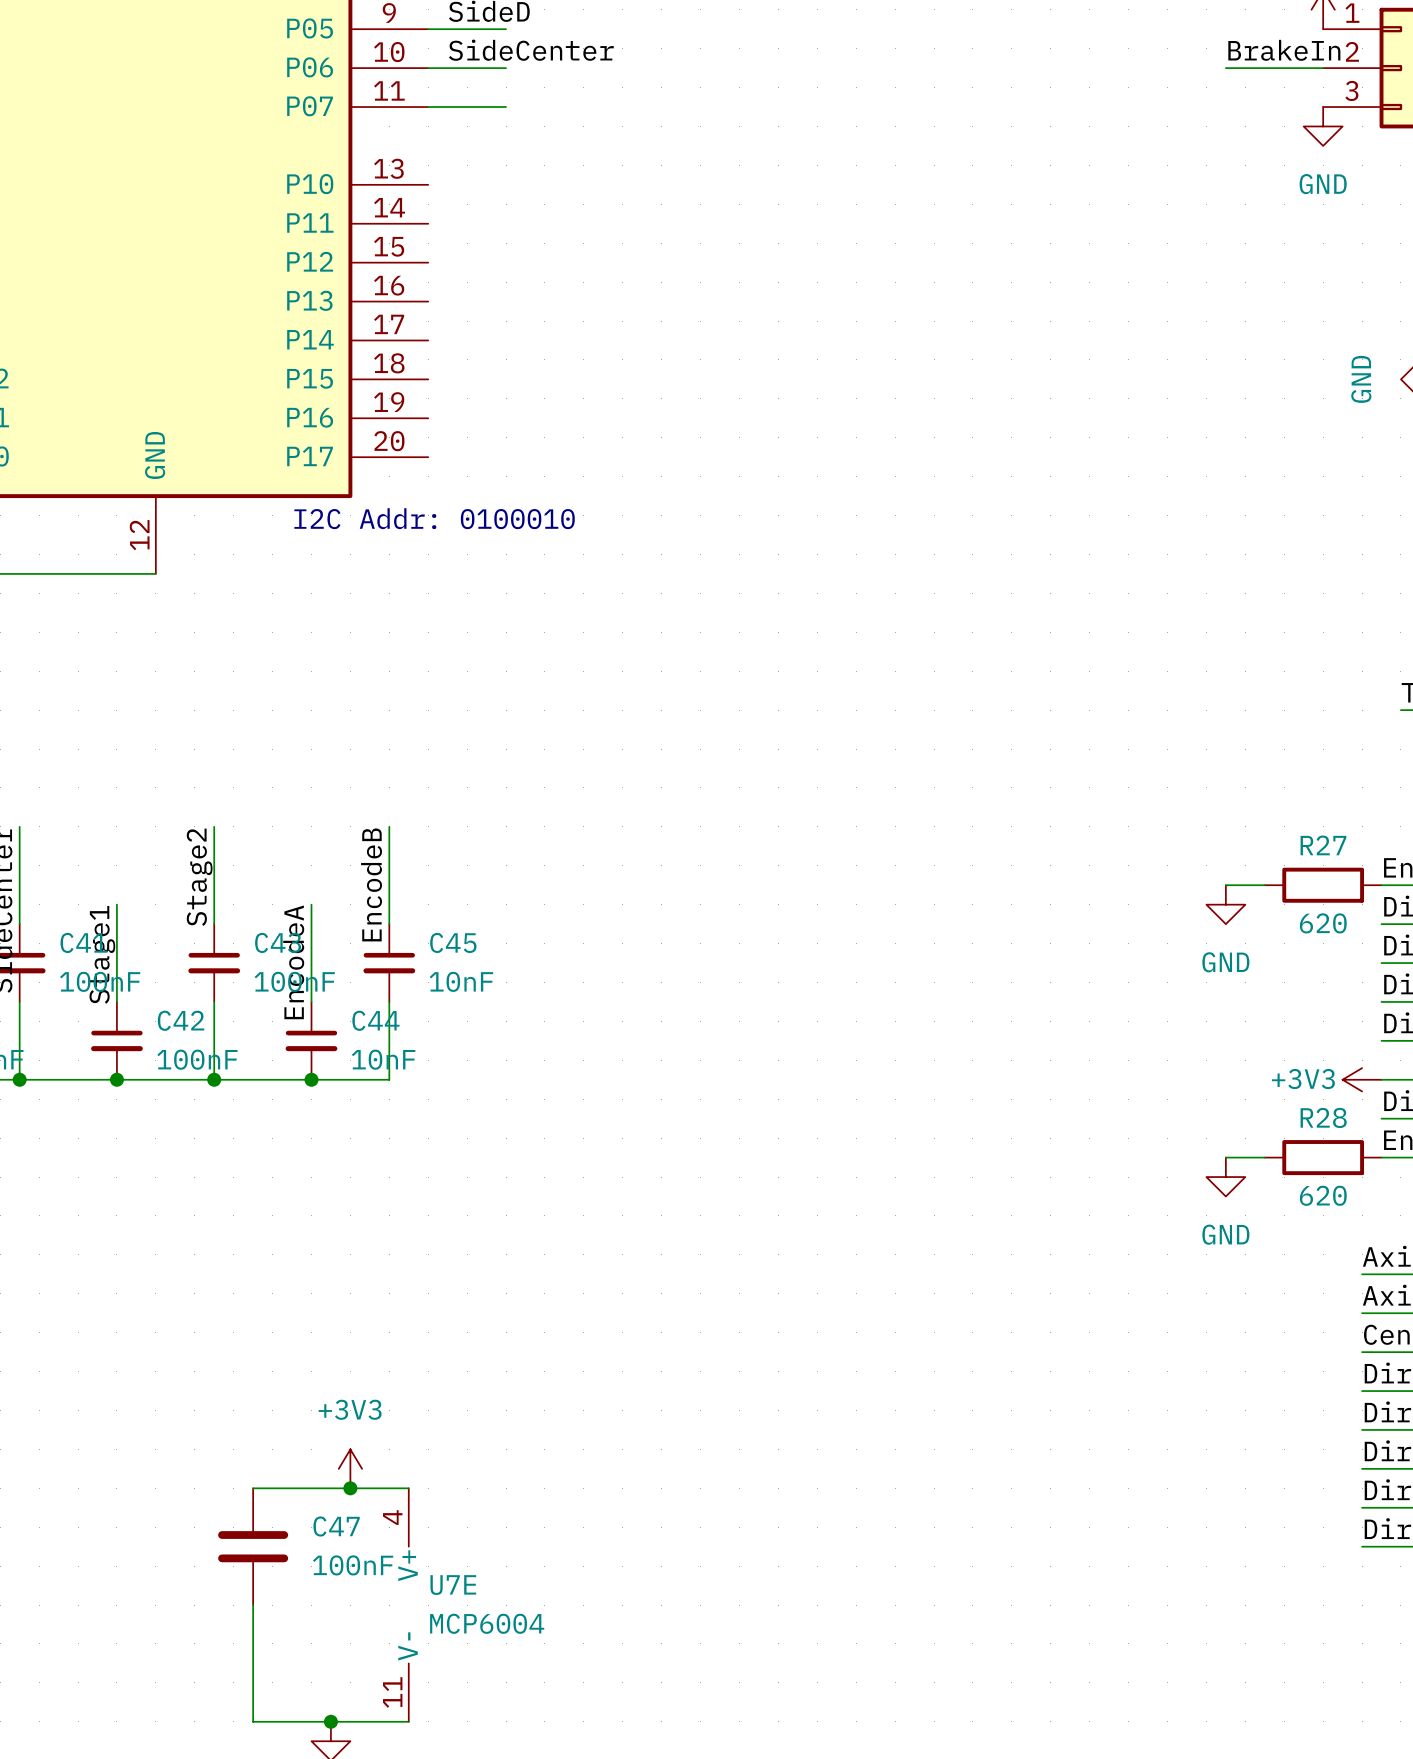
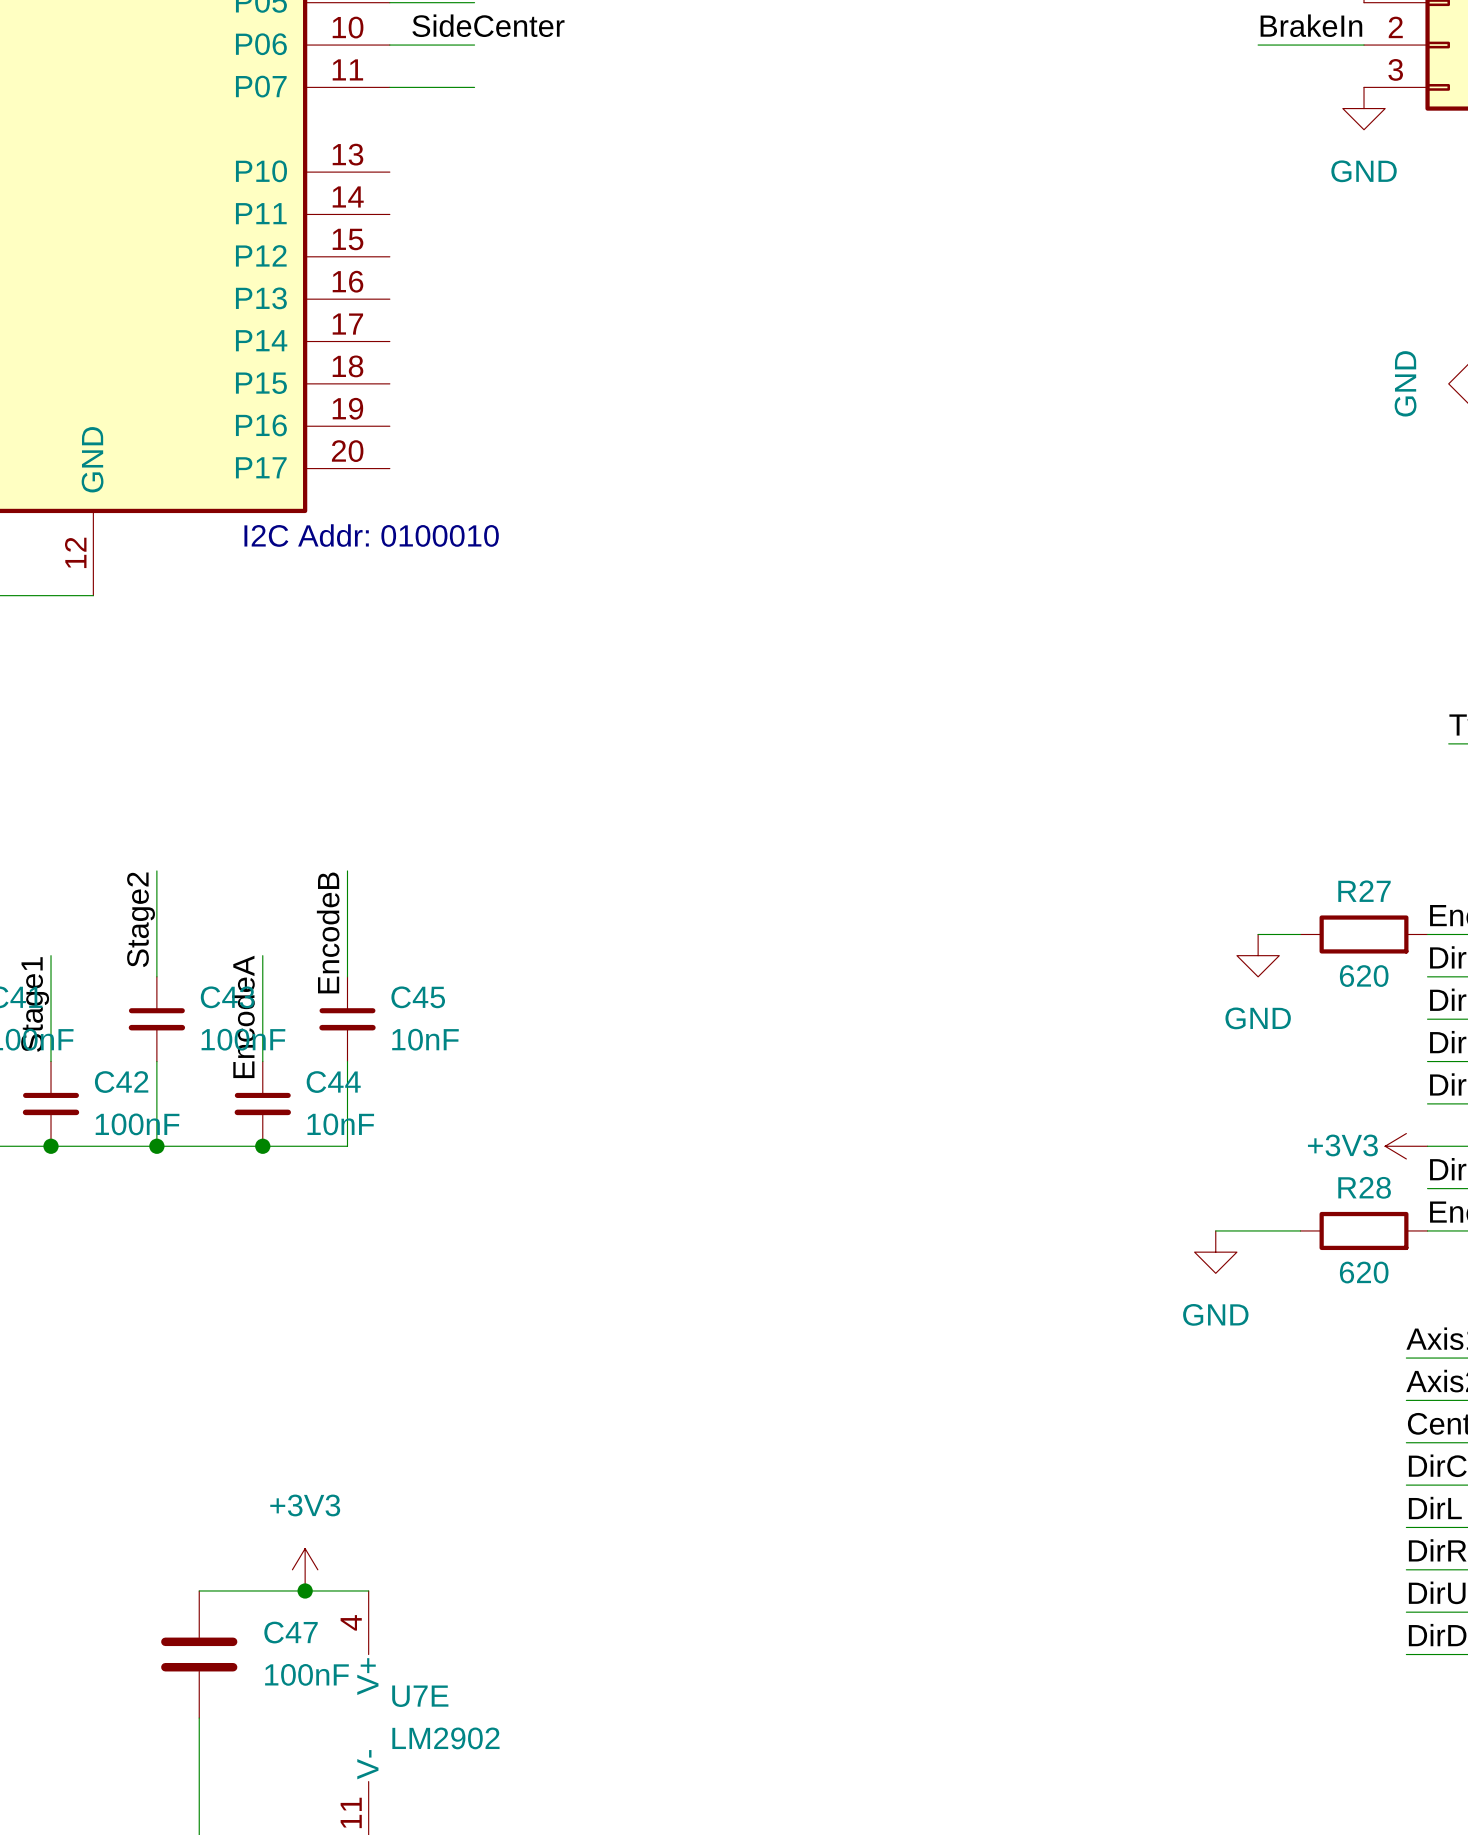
wire: none -> (1215, 1230) (1258, 1230)
power symbol position: GND (1225, 1177) -> GND (1215, 1252)
U7E value: MCP6004 (487, 1623) -> LM2902 (445, 1738)

